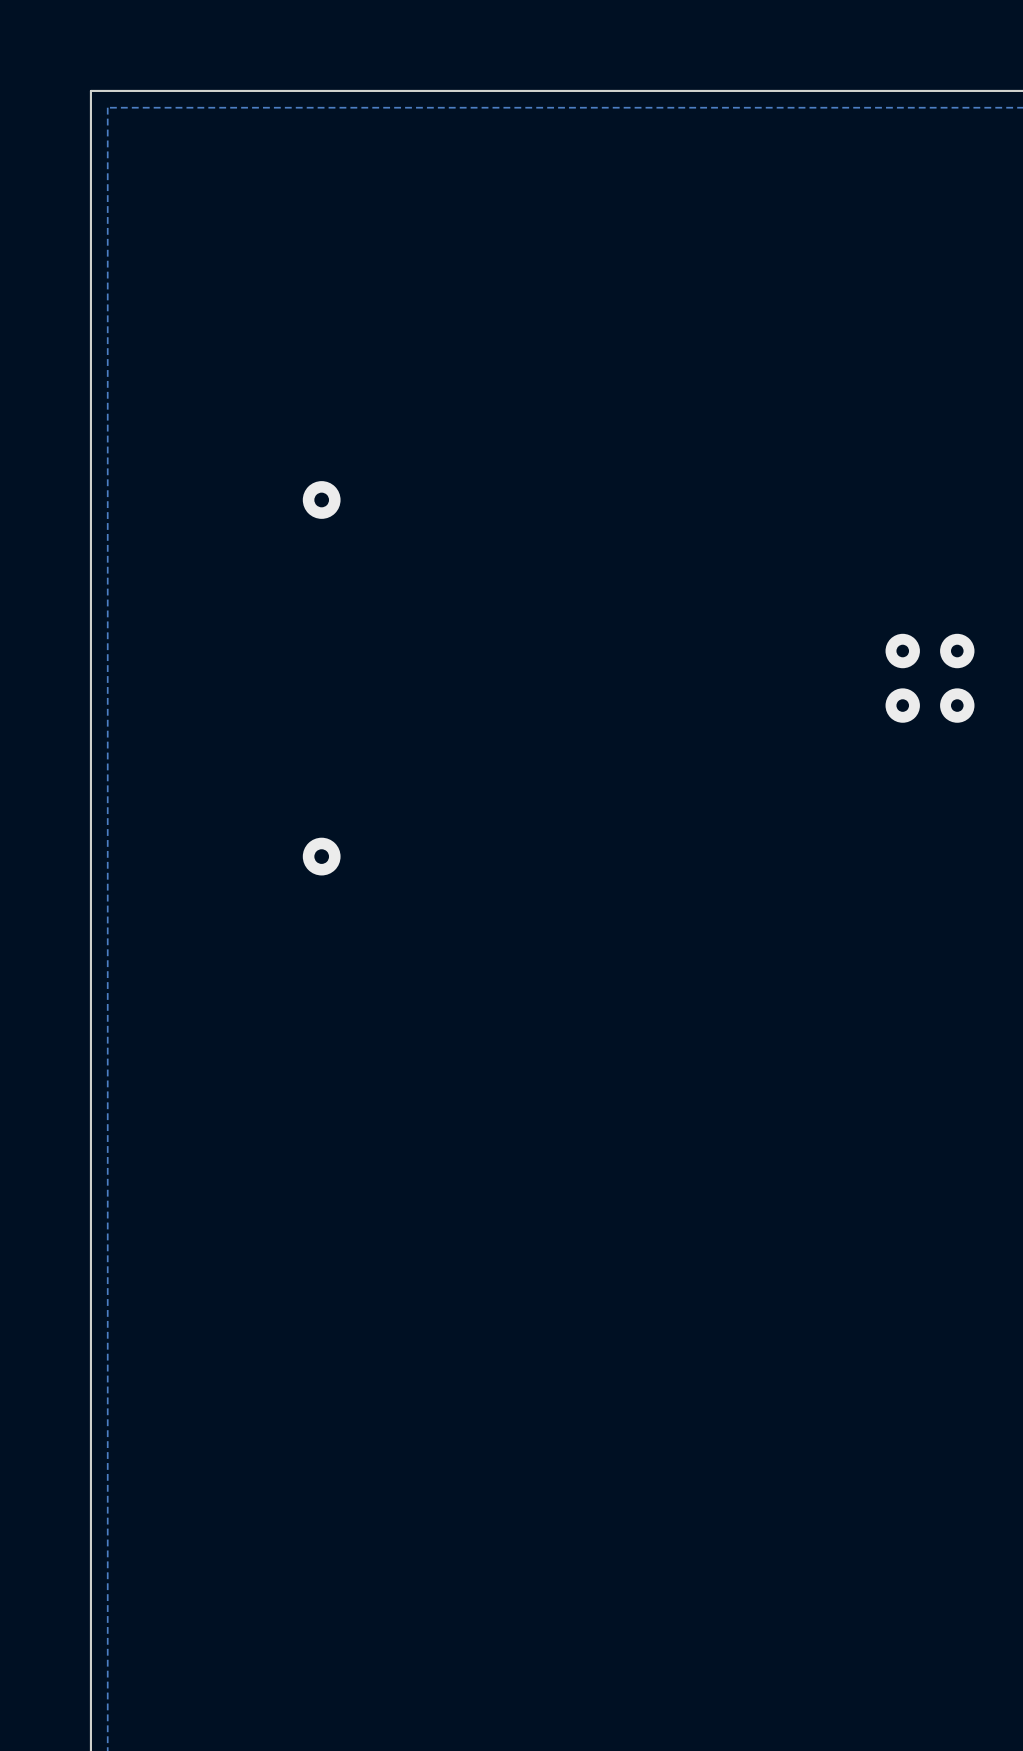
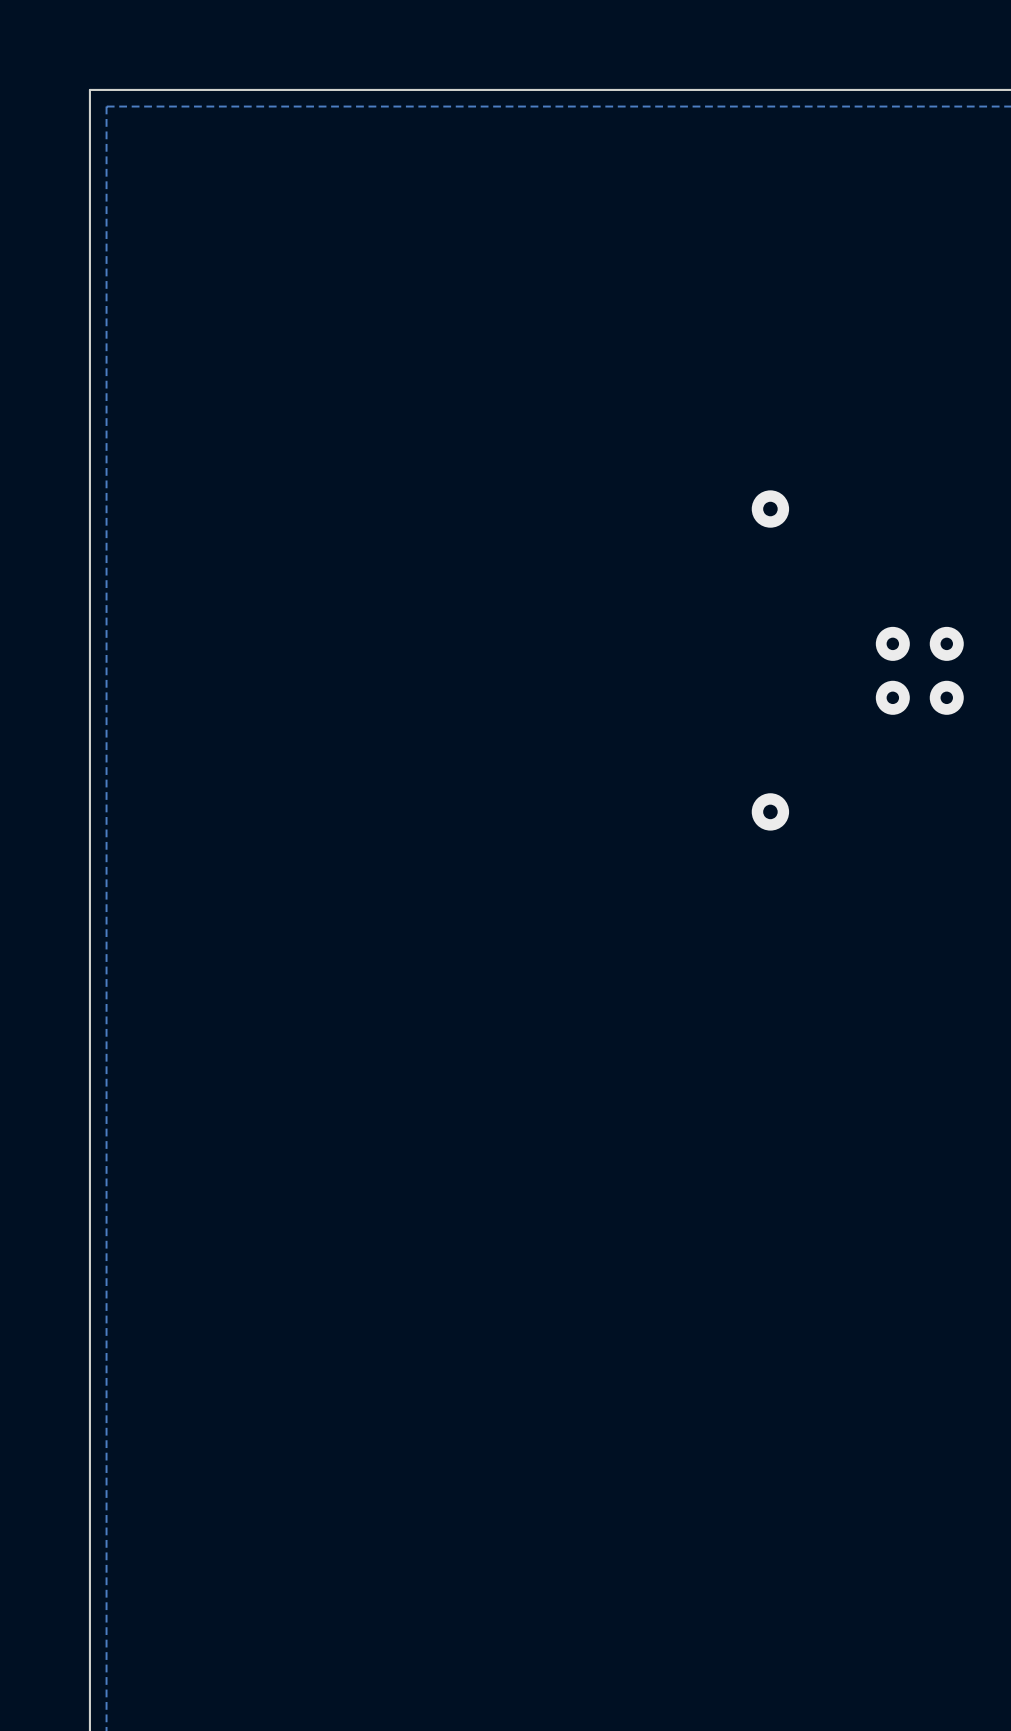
via: (321, 499) -> none
via: none -> (770, 509)
via: none -> (770, 811)
via: (321, 856) -> none

